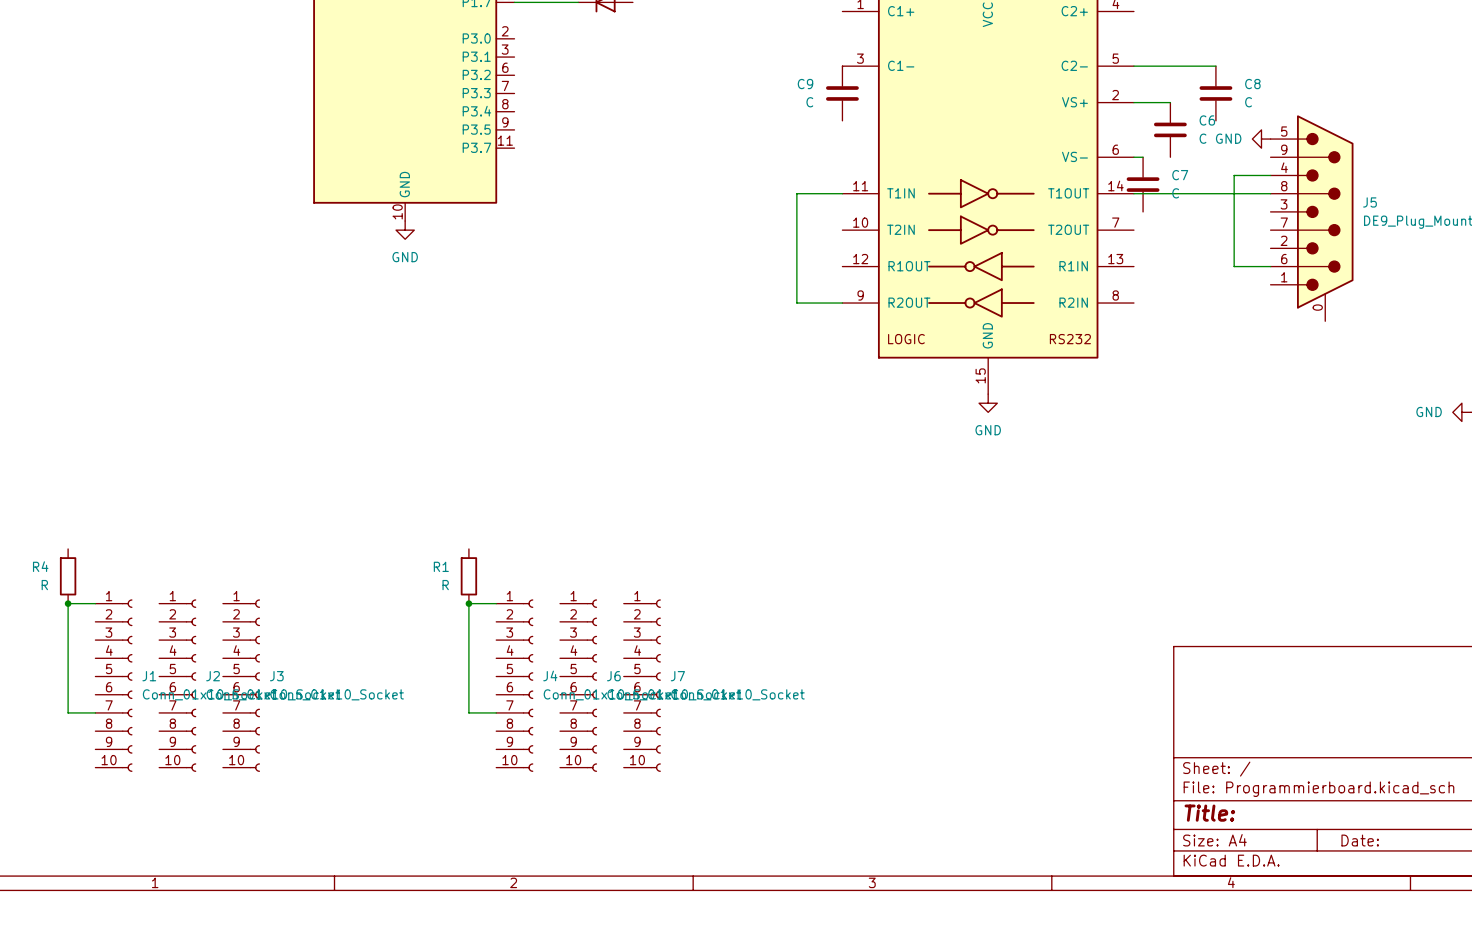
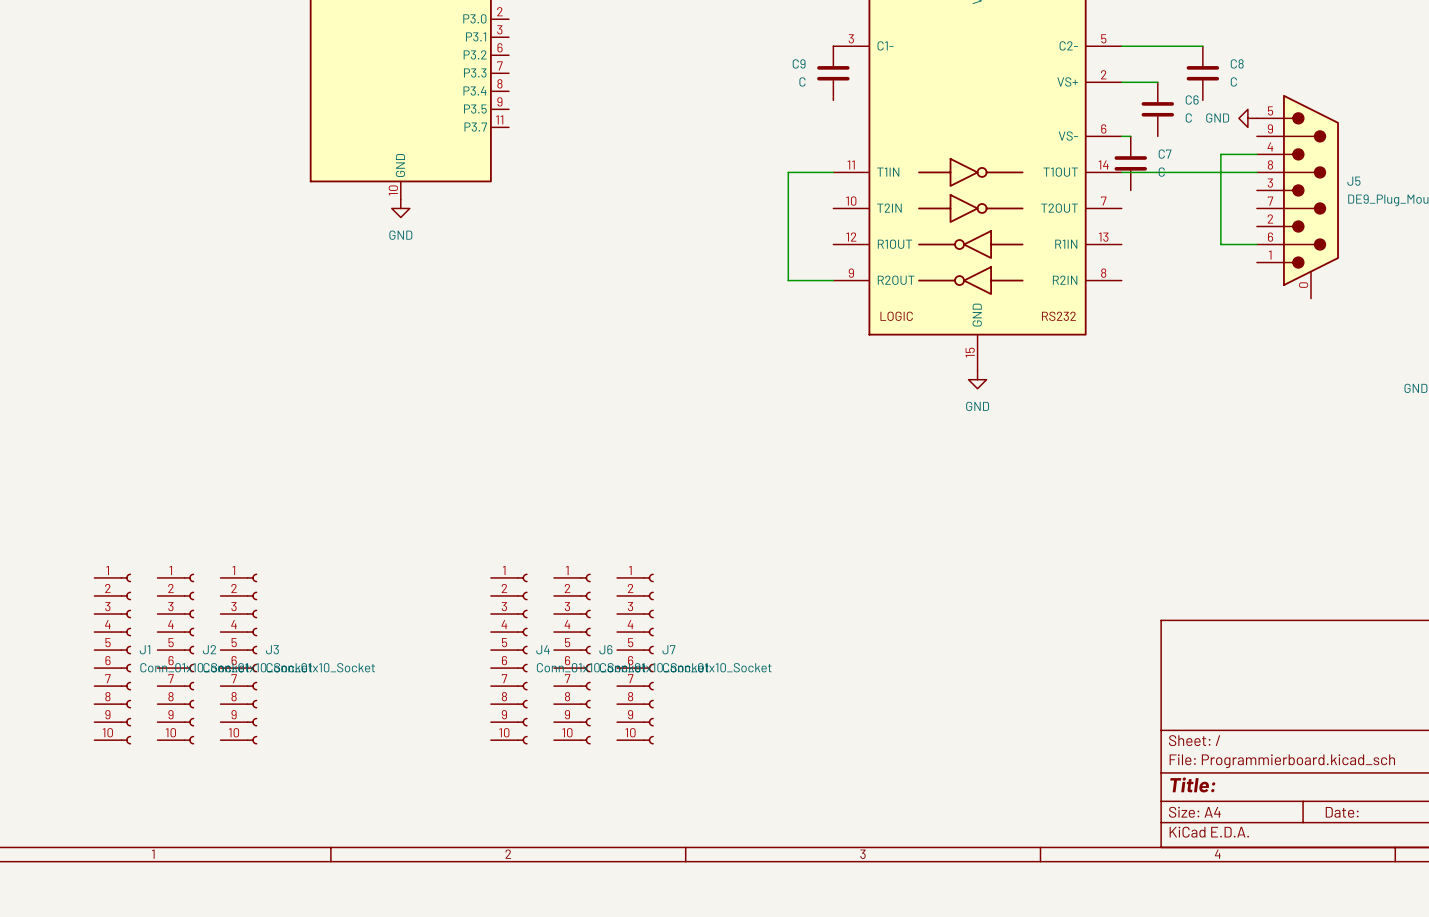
R4: R (68, 576) -> none
R1: R (468, 576) -> none
junction: (68, 603) -> none
wire: (95, 603) (68, 603) (68, 712) (95, 712) -> none
junction: (468, 603) -> none
wire: (496, 603) (468, 603) (468, 712) (496, 712) -> none

